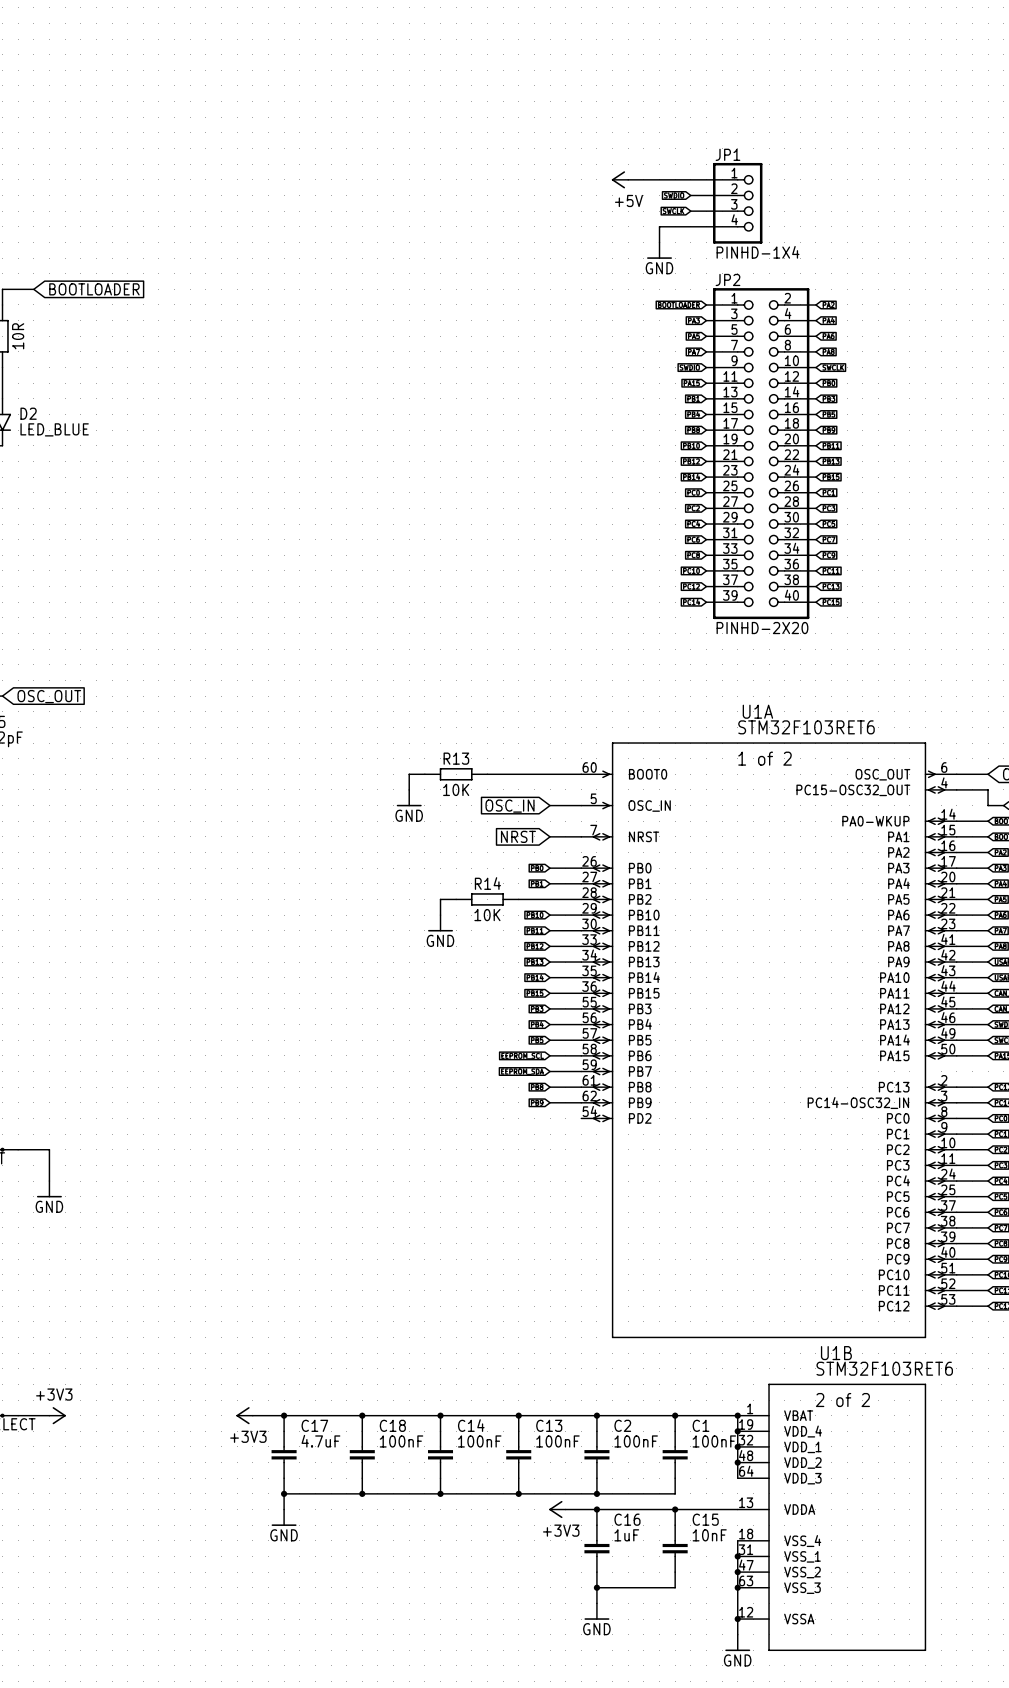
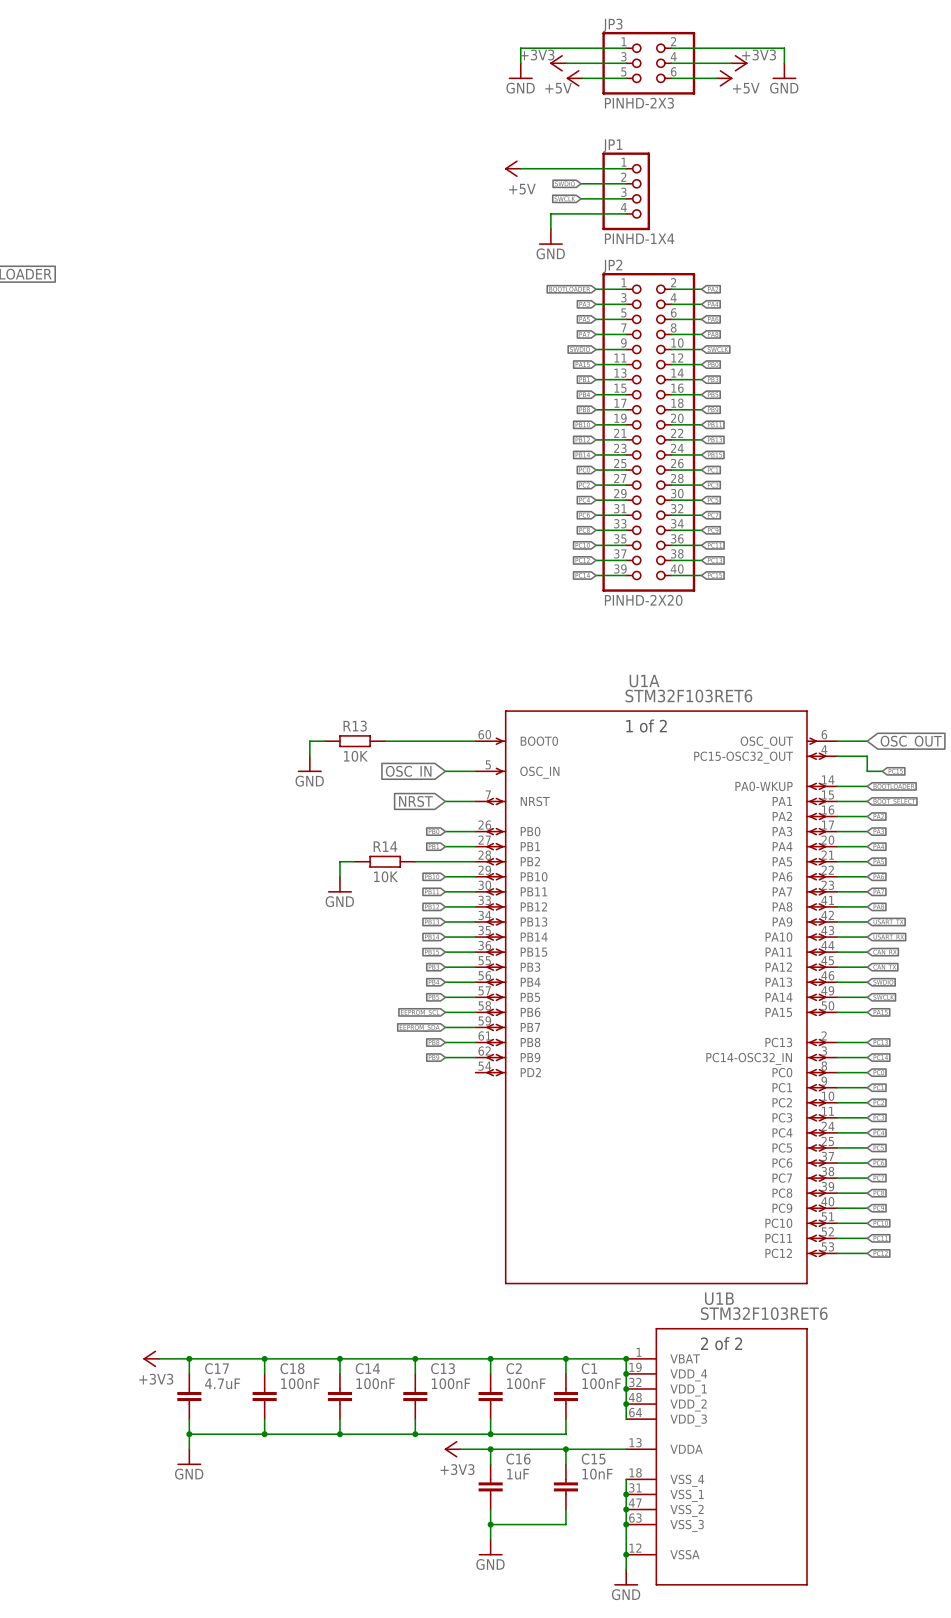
wire: none -> (626, 48) (520, 48) (520, 63)
wire: none -> (671, 48) (784, 48) (784, 63)
power symbol: none -> +3V3 (558, 63)
wire: none -> (565, 63) (626, 63)
JP3: none -> PINHD-2X3 (648, 63)
wire: none -> (671, 63) (731, 63)
power symbol: none -> +3V3 (739, 63)
power symbol: none -> GND (520, 71)
power symbol: none -> GND (784, 71)
power symbol: none -> +5V (574, 78)
wire: none -> (582, 78) (626, 78)
wire: none -> (671, 78) (716, 78)
power symbol: none -> +5V (724, 78)

